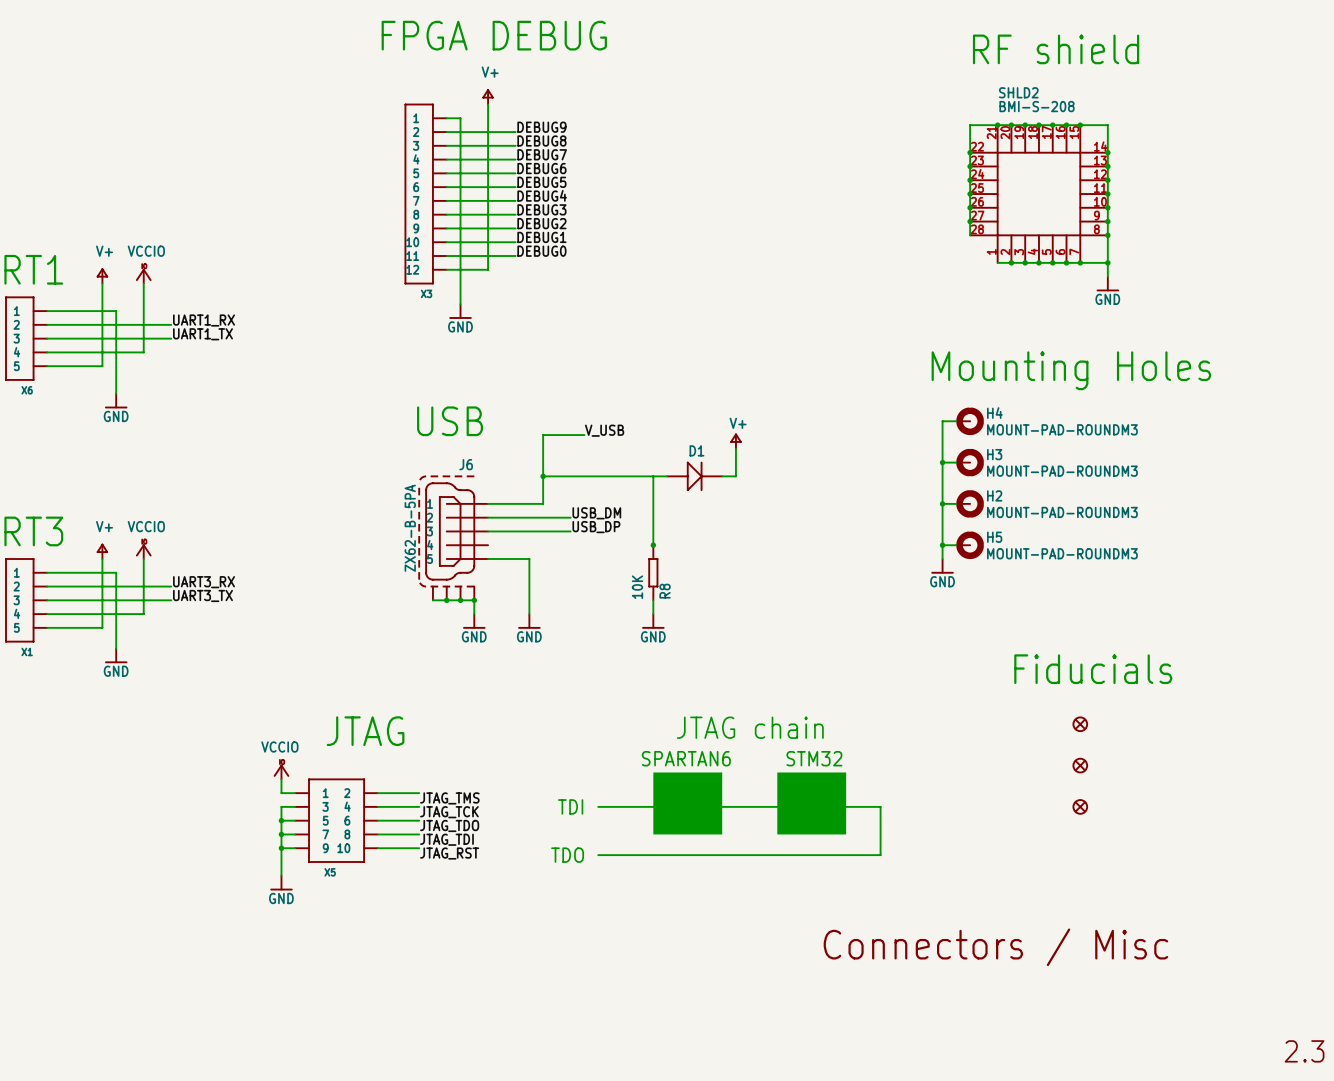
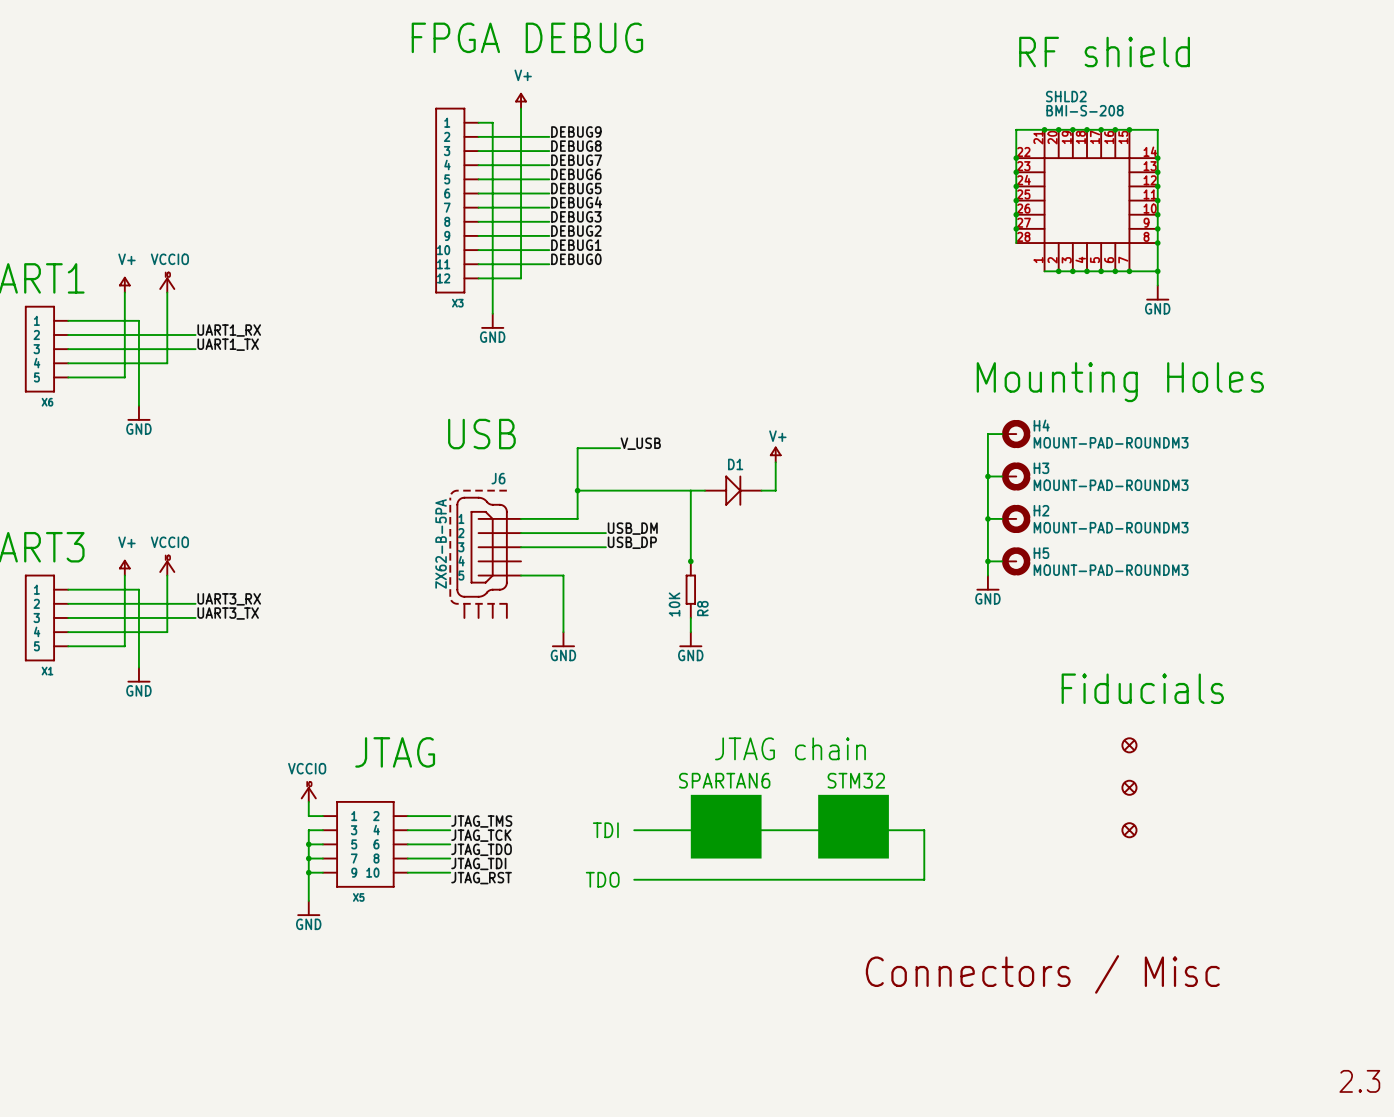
wire: (432, 600) (474, 600) (474, 614) -> none
junction: (446, 600) -> none
junction: (460, 600) -> none
junction: (474, 600) -> none
power symbol: GND (474, 621) -> none

